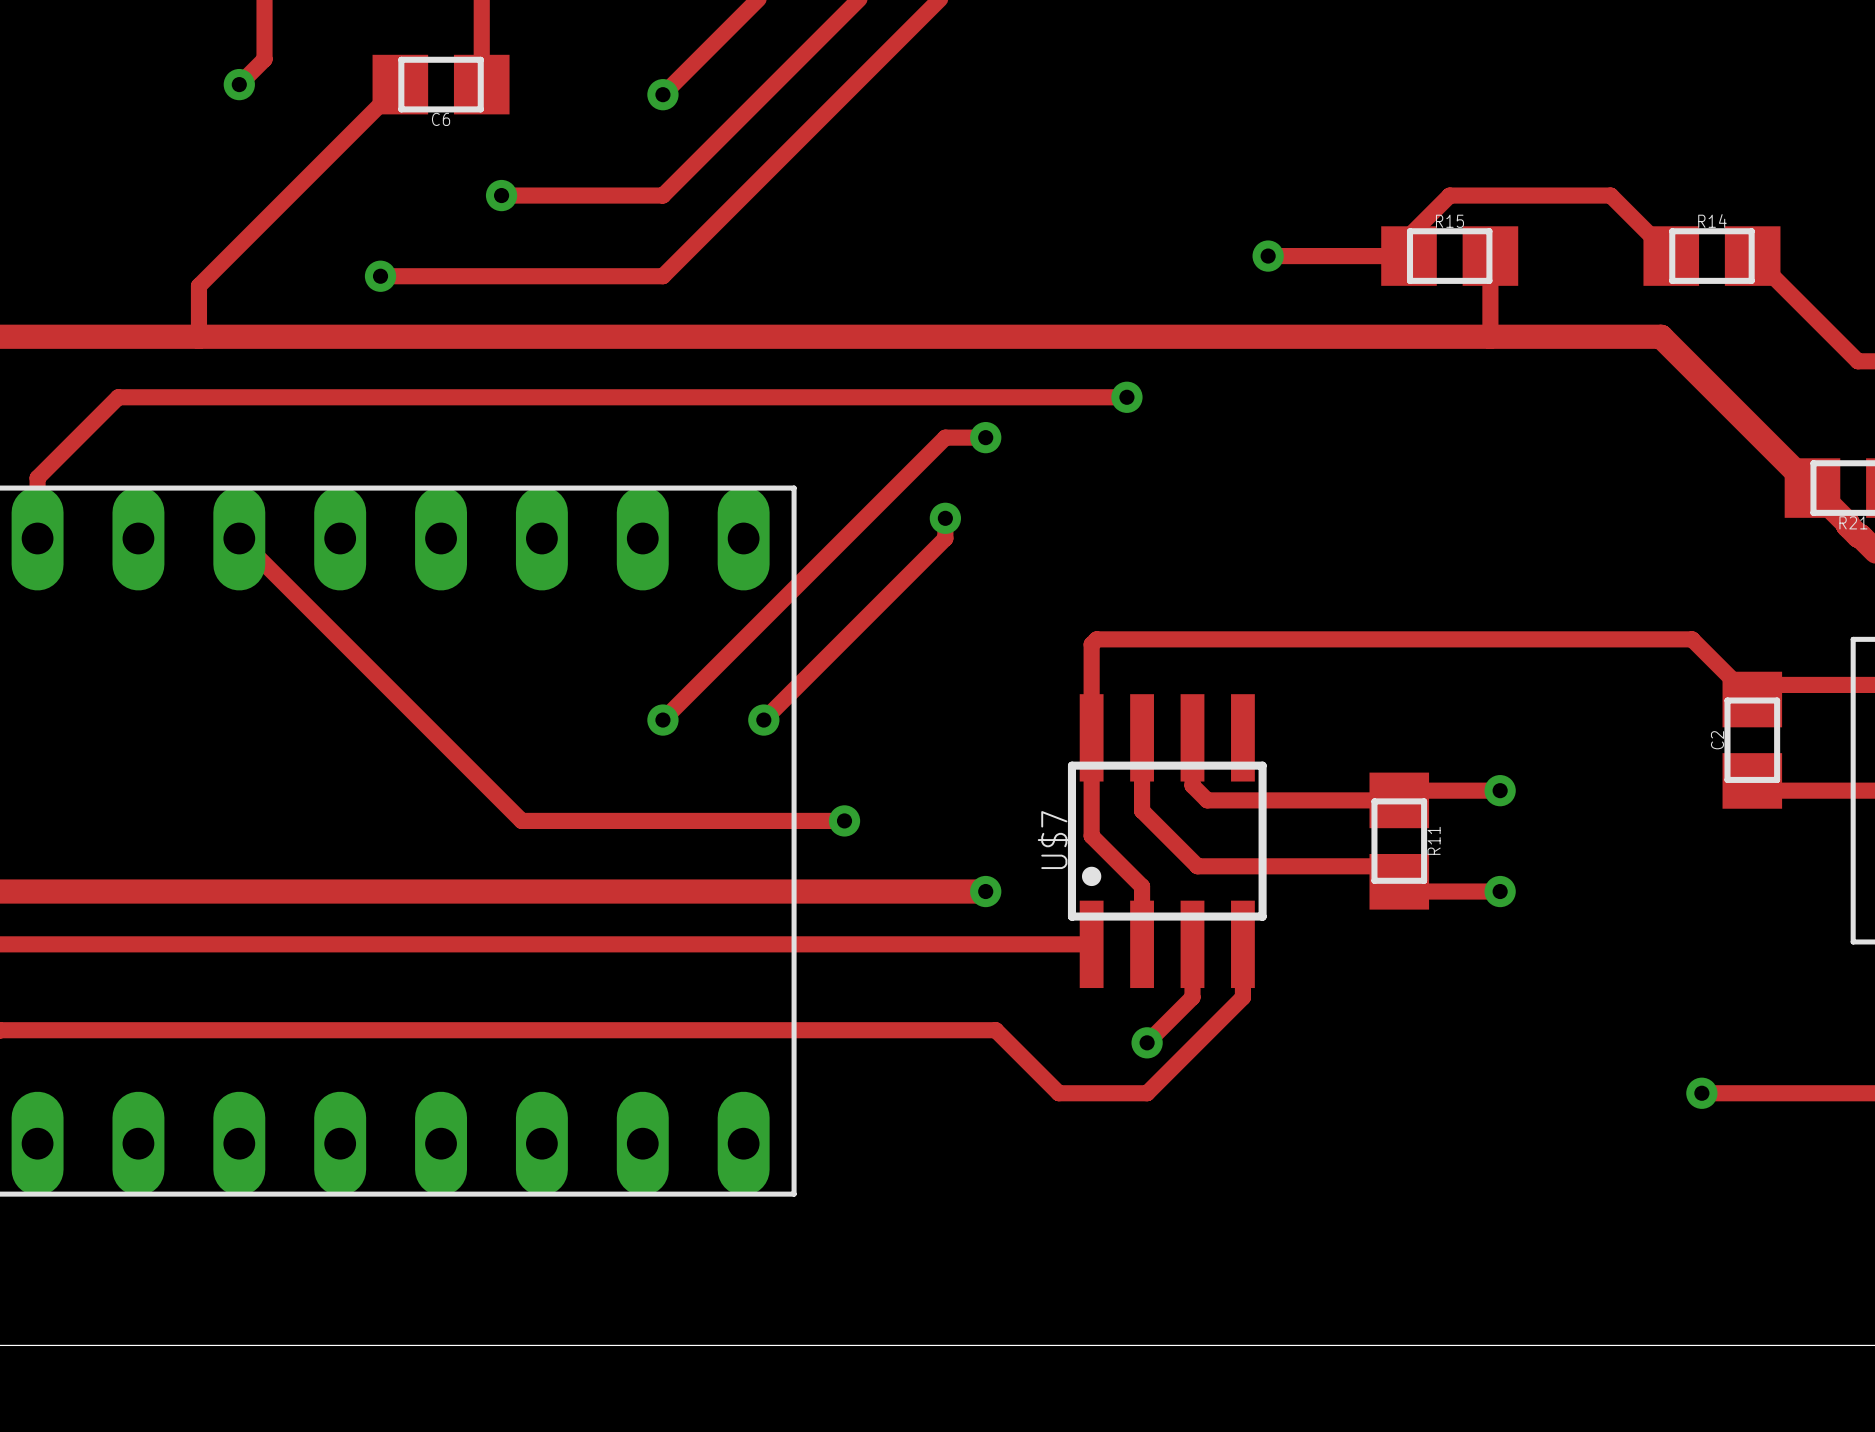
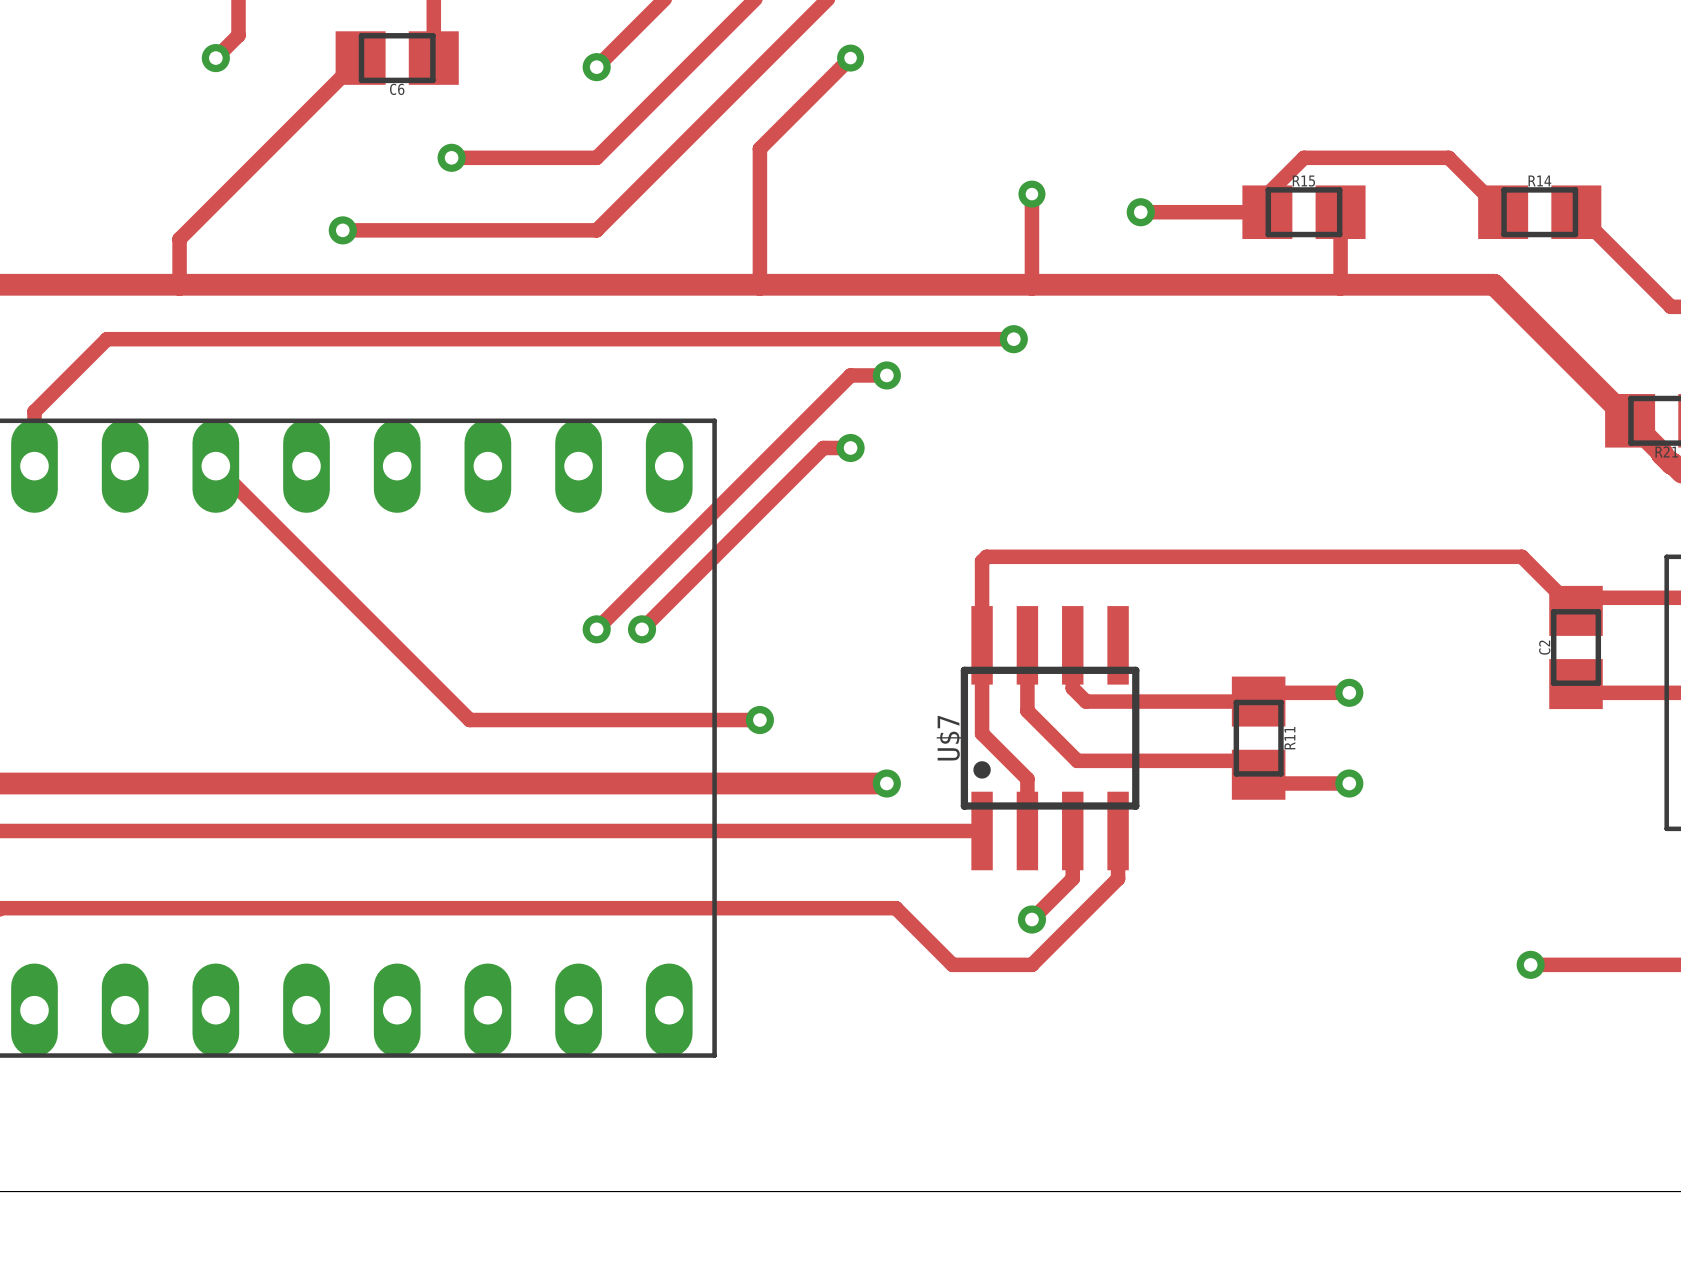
track: none -> (850, 58) (759, 148) (759, 284)
via: none -> (850, 58)
track: none -> (1031, 194) (1031, 284)
via: none -> (1031, 194)
track: (945, 518) (945, 538) (763, 720) -> (850, 447) (823, 447) (642, 629)
via position: (763, 720) -> (642, 629)

